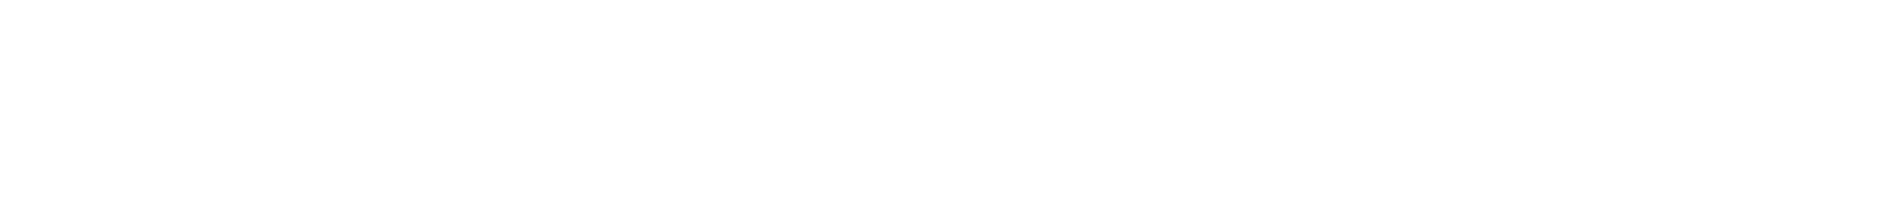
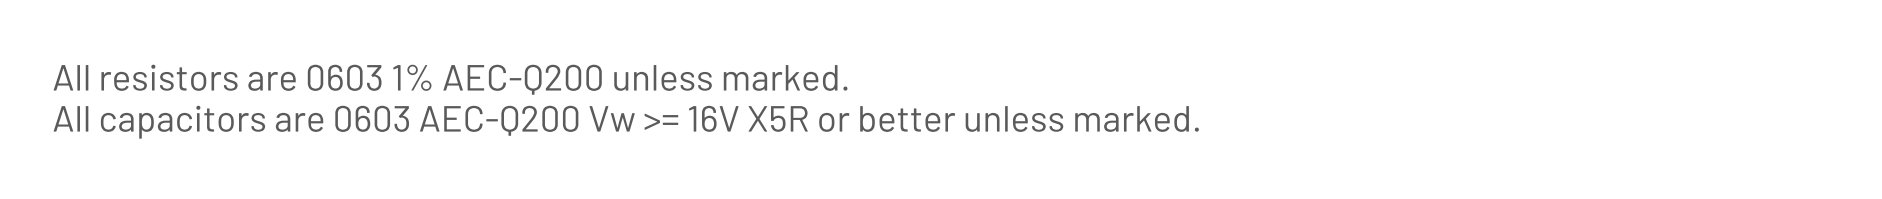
text: none -> All resistors are 0603 1% AEC-Q200 unless marked. (450, 79)
text: none -> All capacitors are 0603 AEC-Q200 Vw >= 16V X5R or better unless marked. (626, 122)

